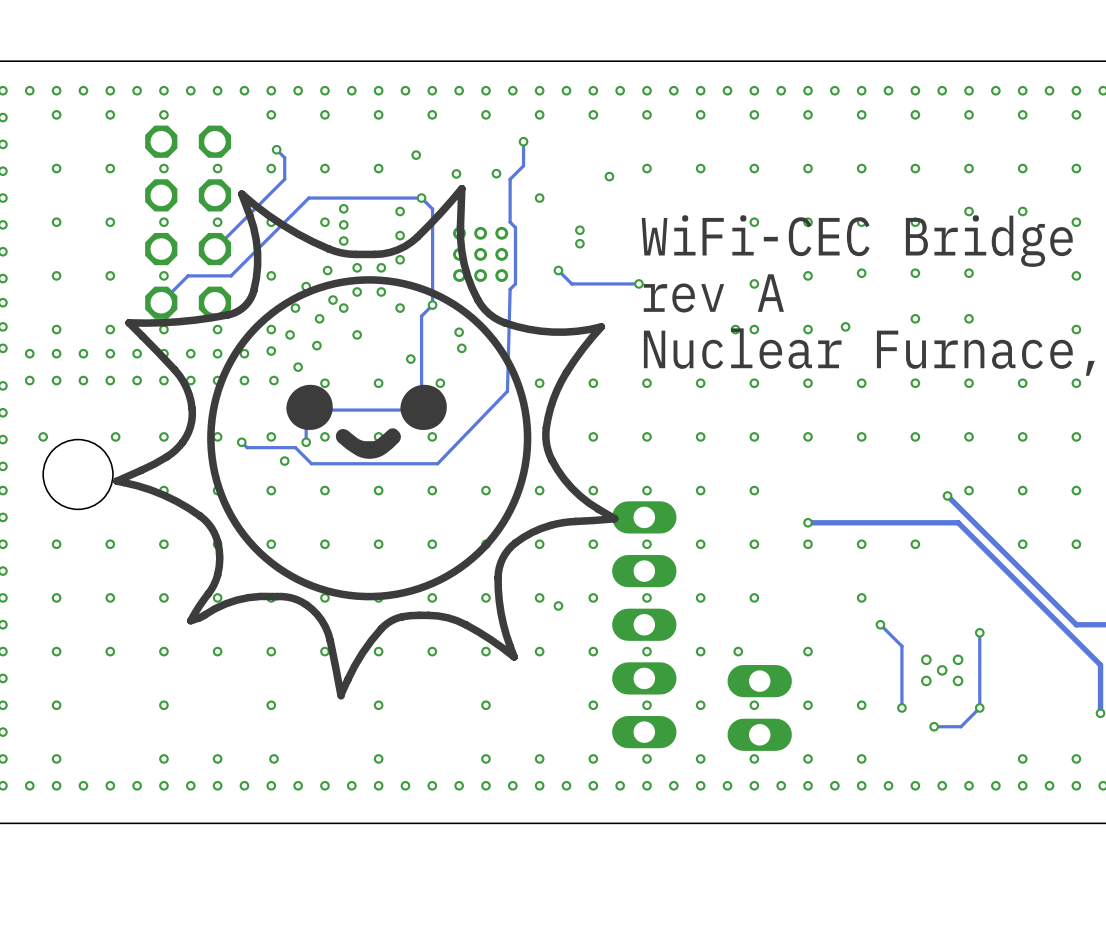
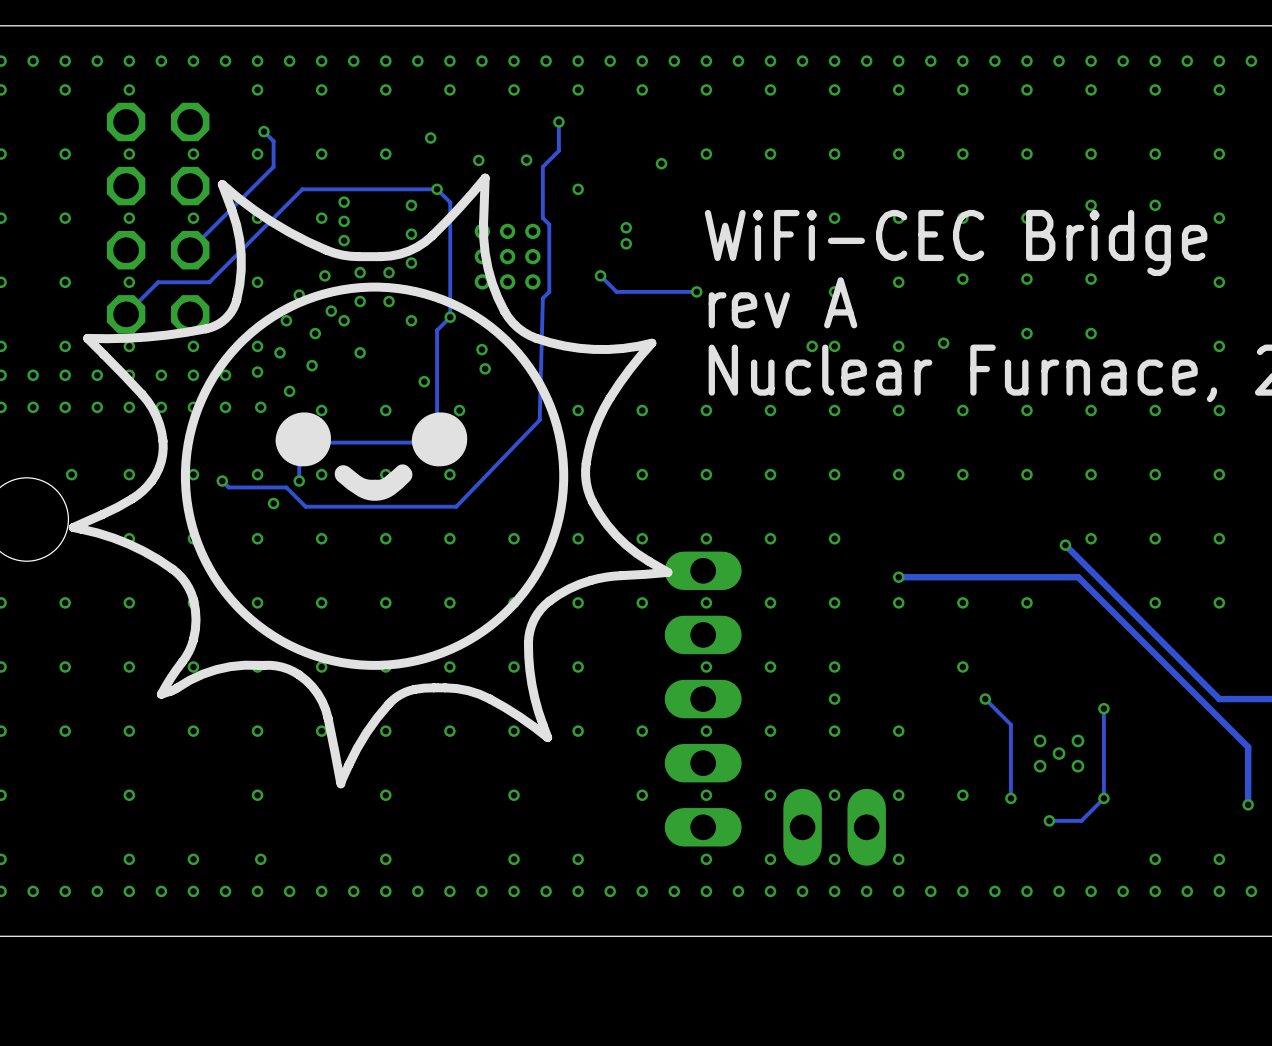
via: (593, 597) -> none
via: (558, 605) -> none
via: none -> (834, 699)
via: (738, 651) -> none
via: none -> (834, 731)
part rotation: 0° (759, 707) -> 90° clockwise (834, 827)
via: (593, 758) -> none
via: (861, 758) -> none

